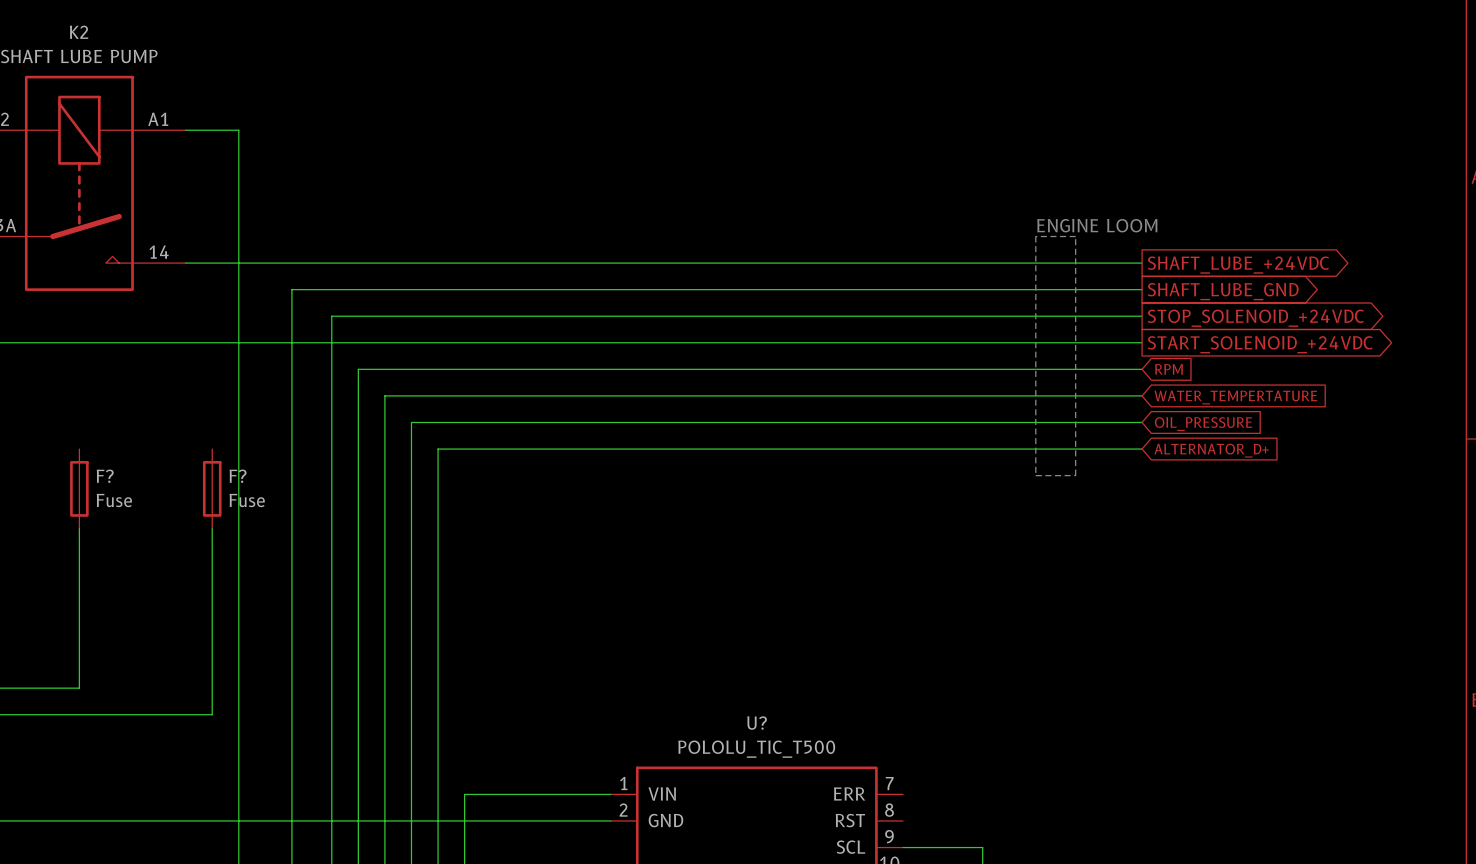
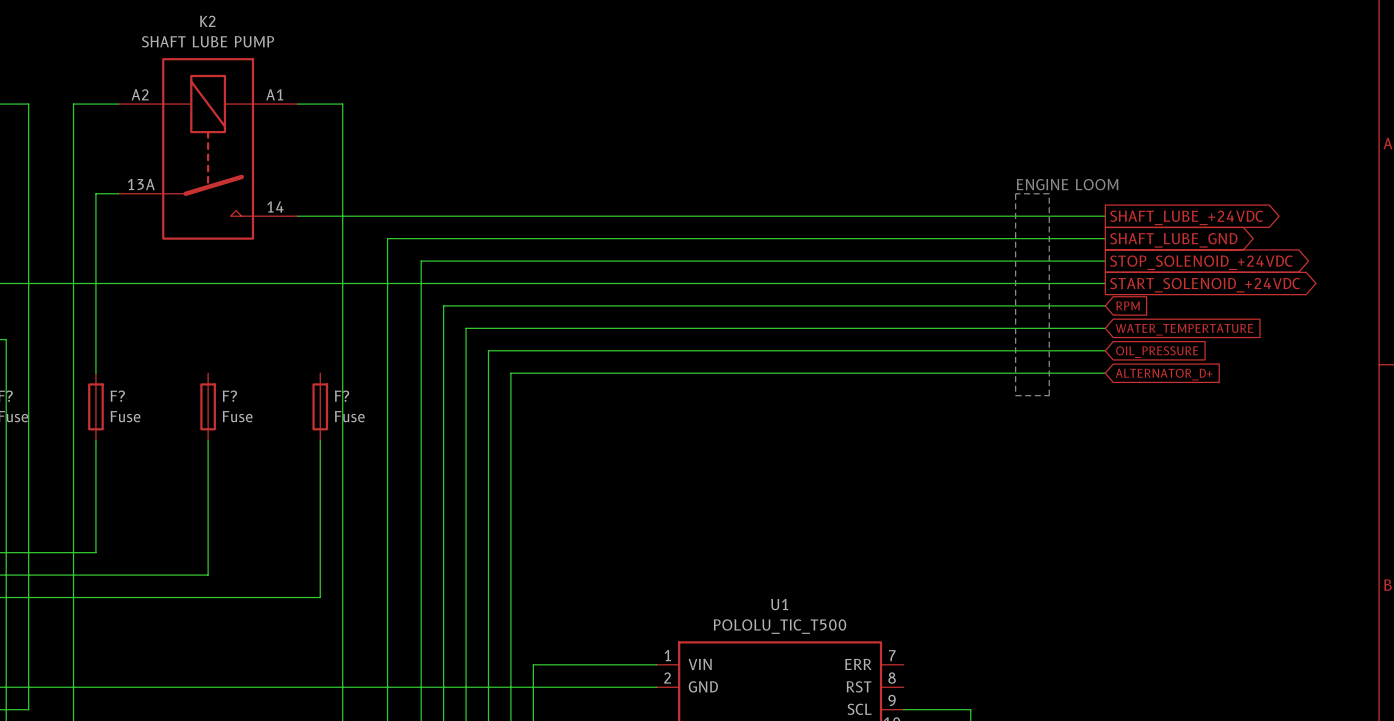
U? name: U? (757, 723) -> U1 (779, 604)

